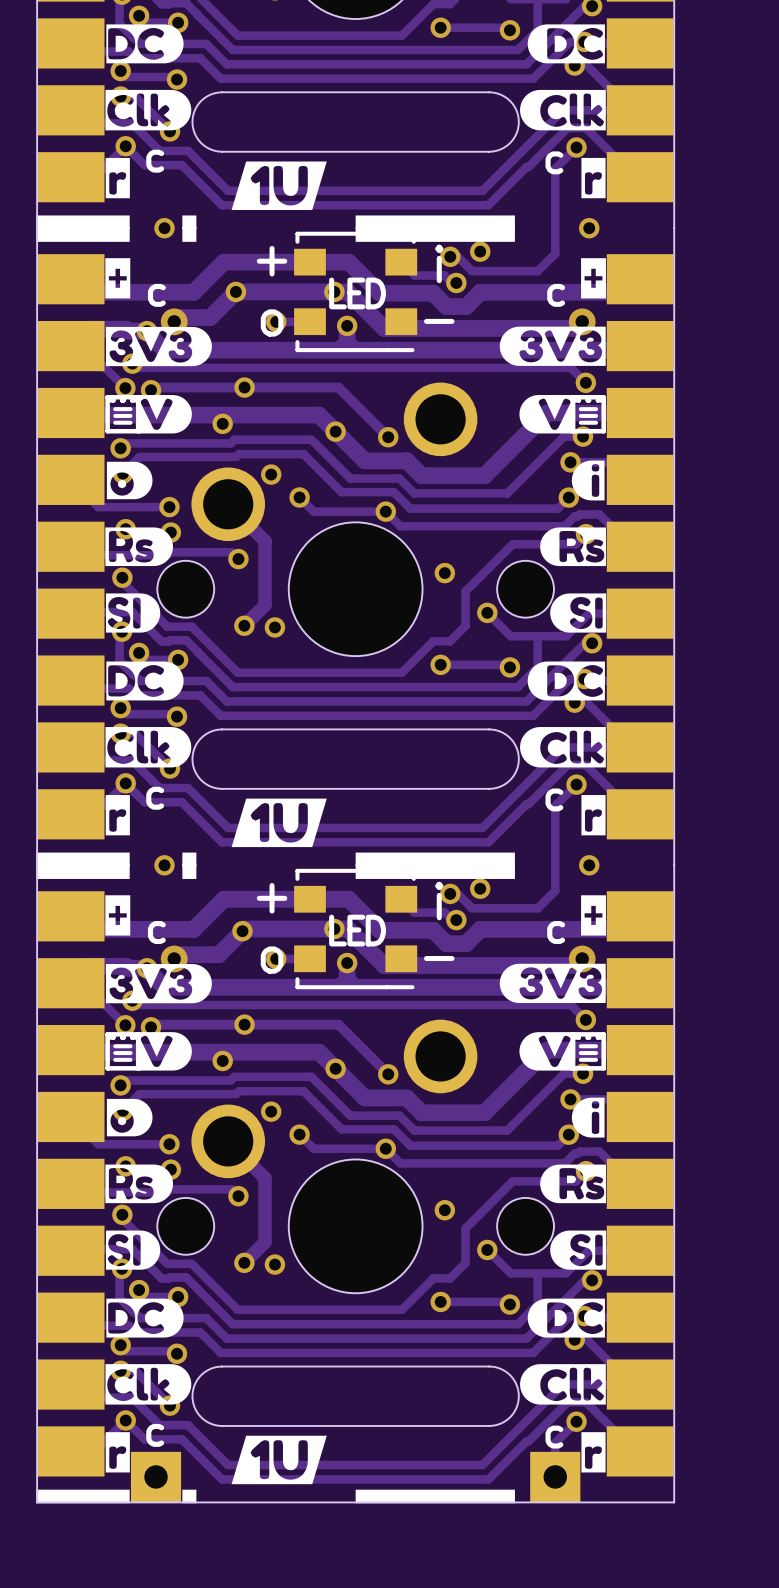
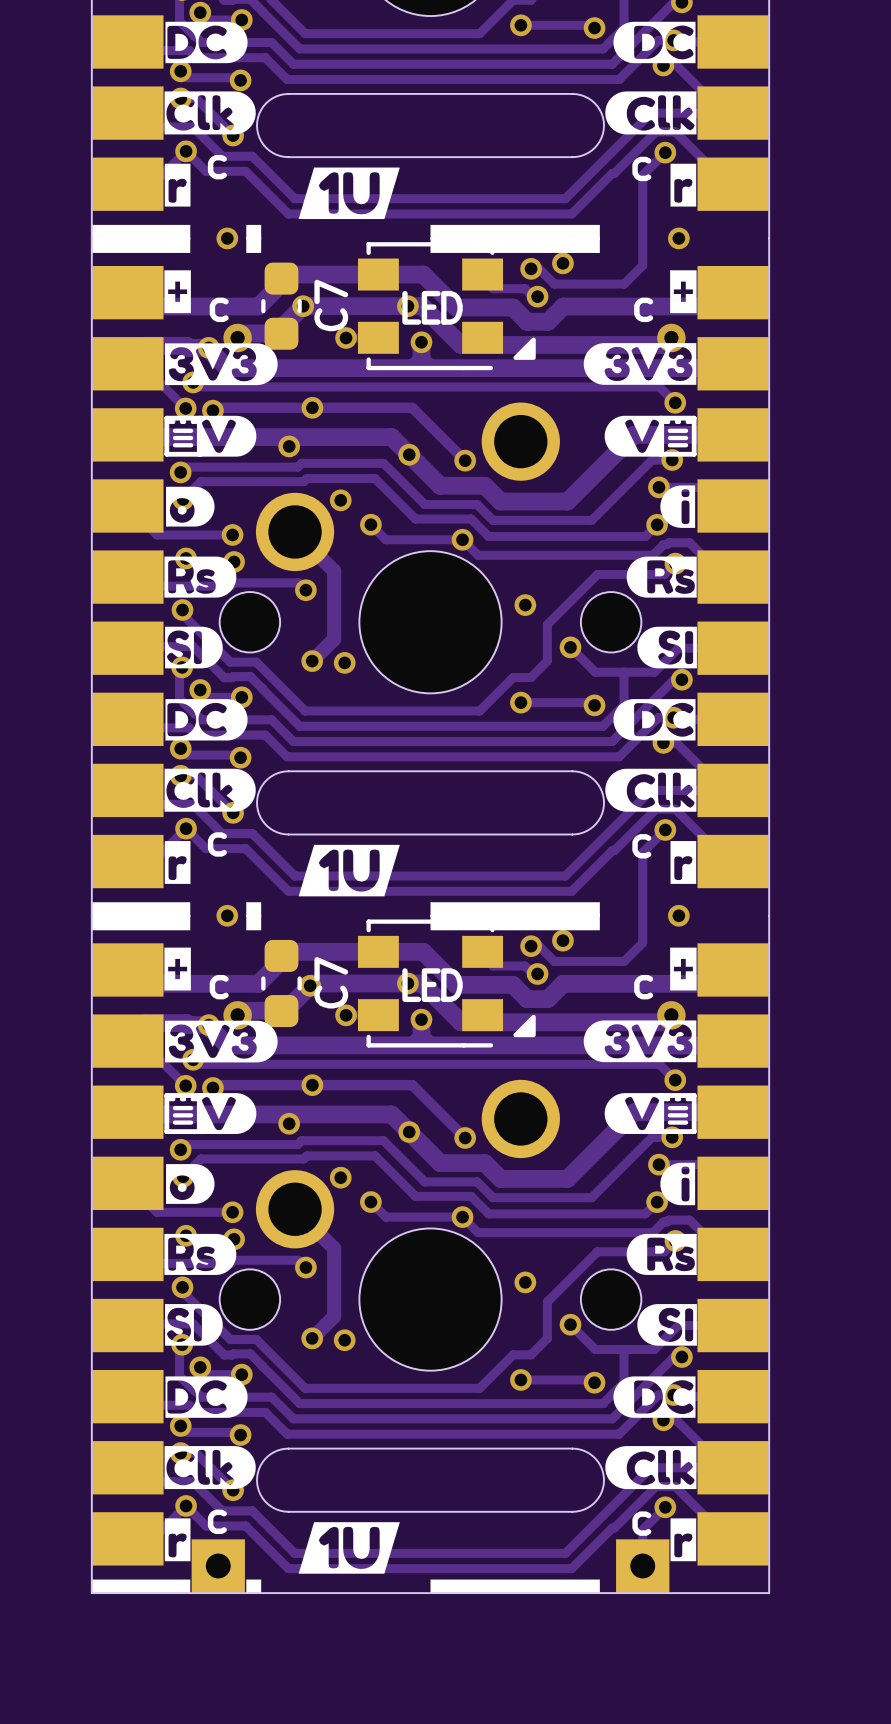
part footprint: [294, 231, 418, 353] -> [357, 242, 536, 371]
C7: none -> (281, 306)
part footprint: [294, 868, 418, 990] -> [357, 919, 536, 1048]
C7: none -> (281, 983)

